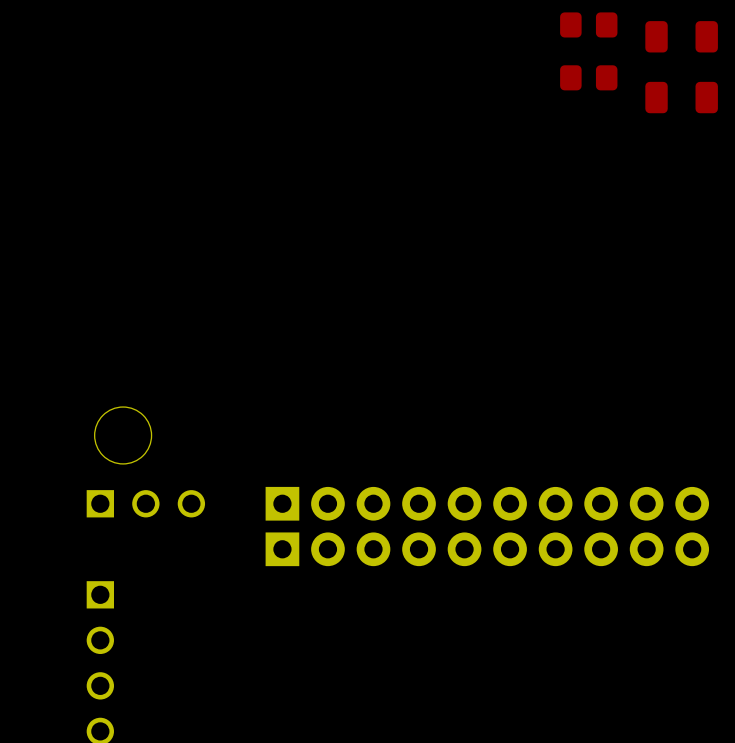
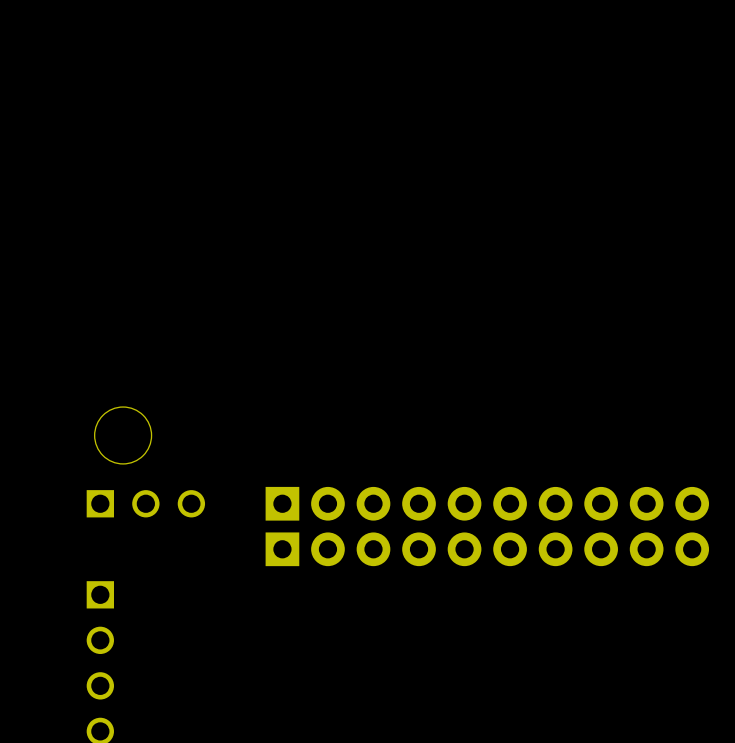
part: (588, 24) -> none
part: (681, 36) -> none
part: (588, 77) -> none
part: (681, 97) -> none

